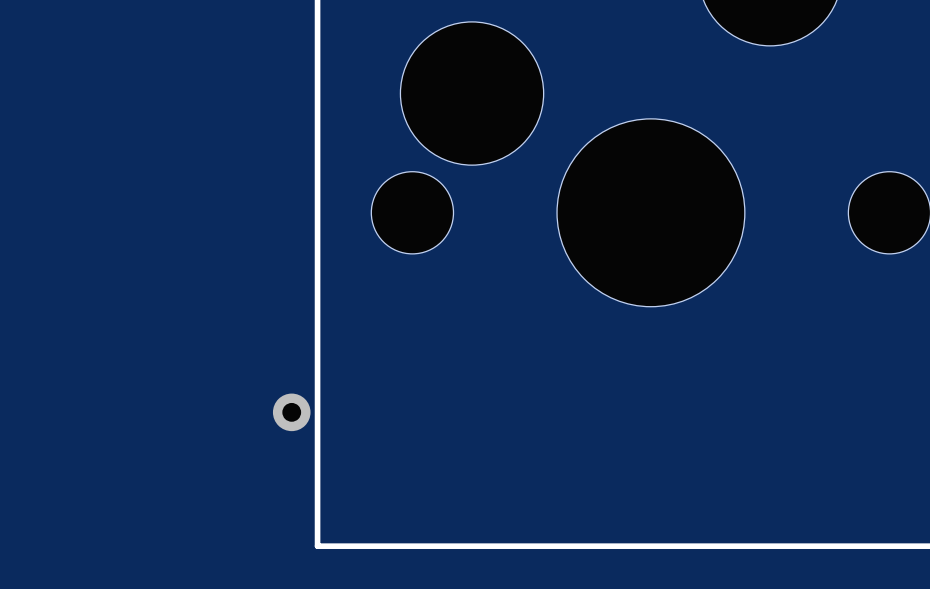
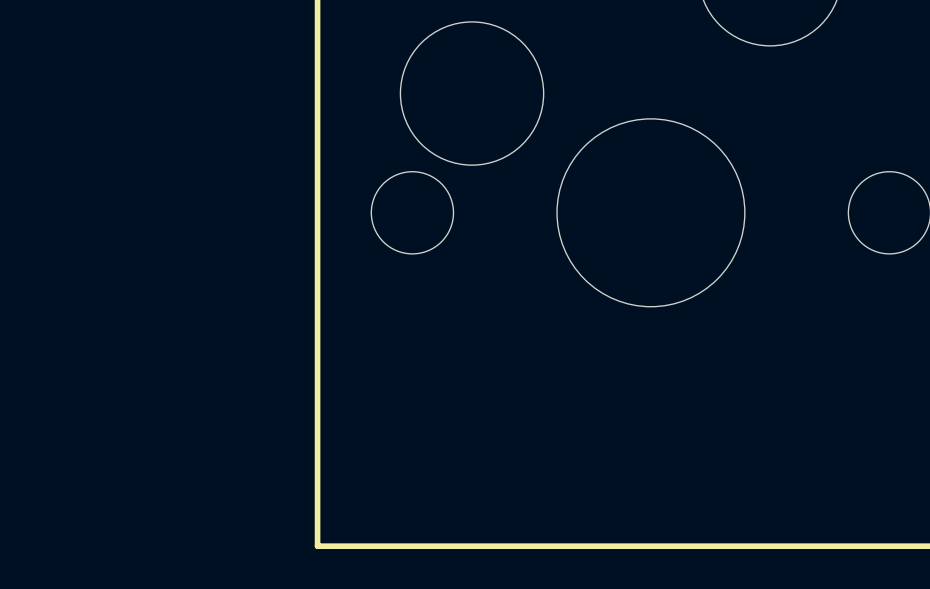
via: (291, 412) -> none

